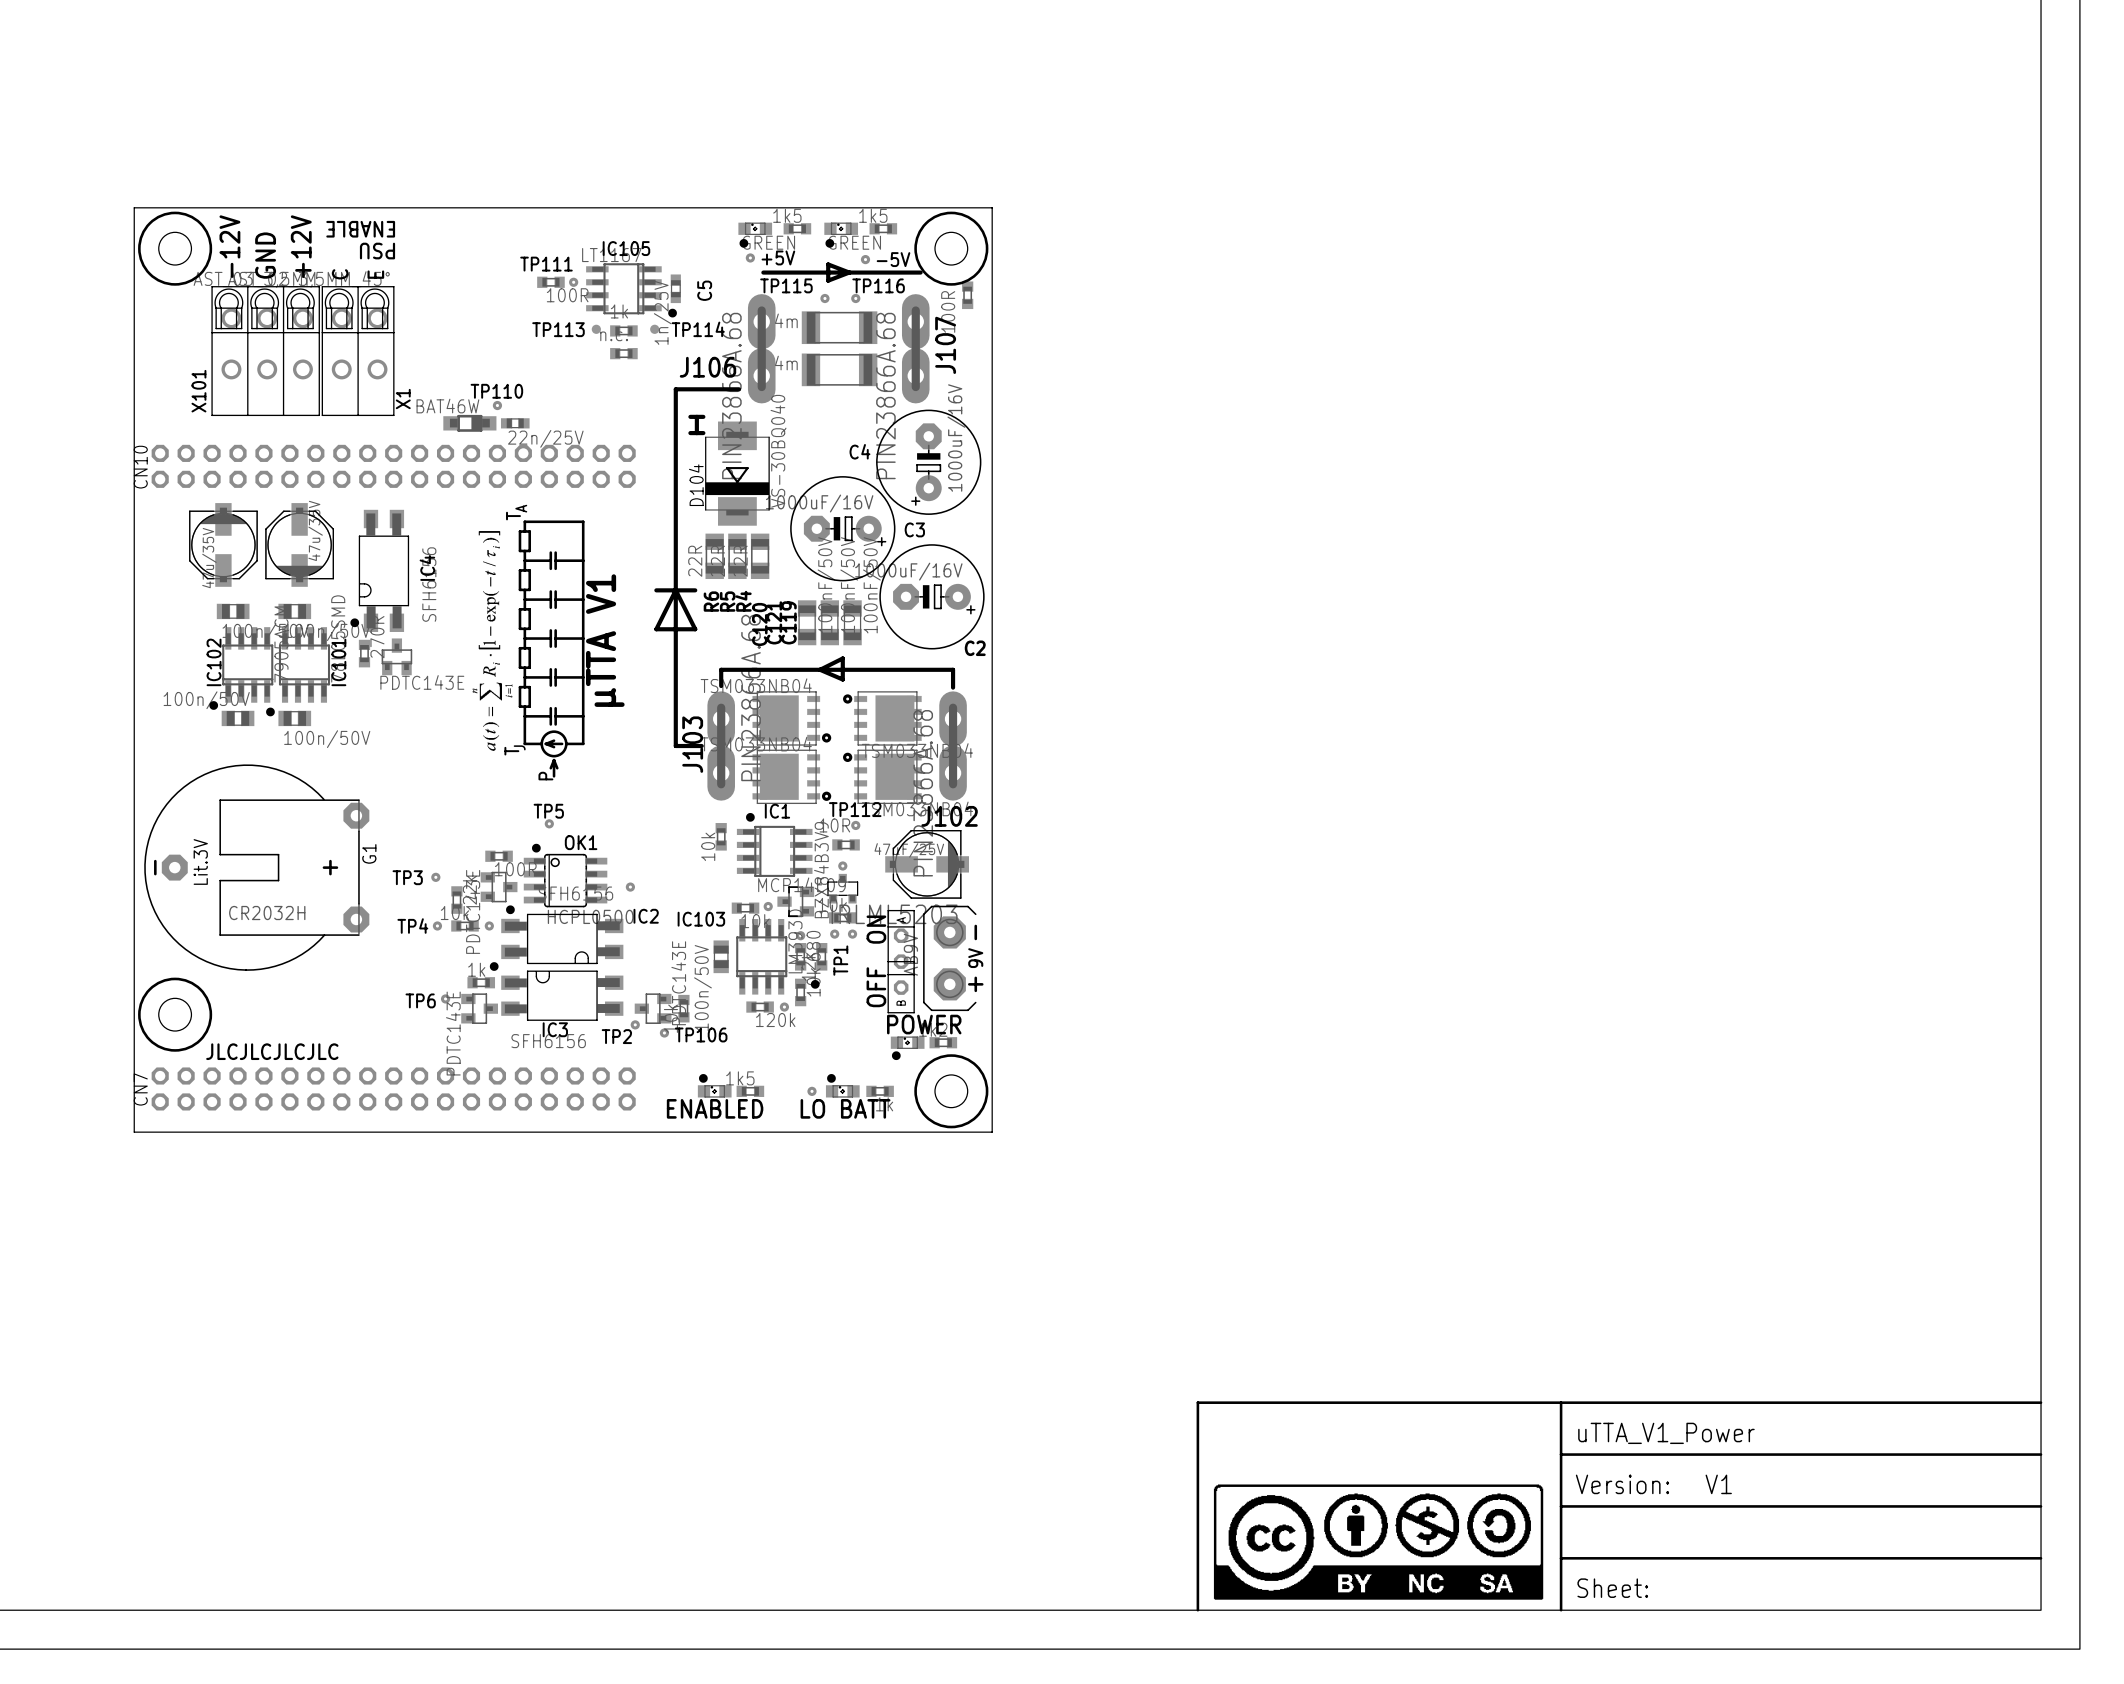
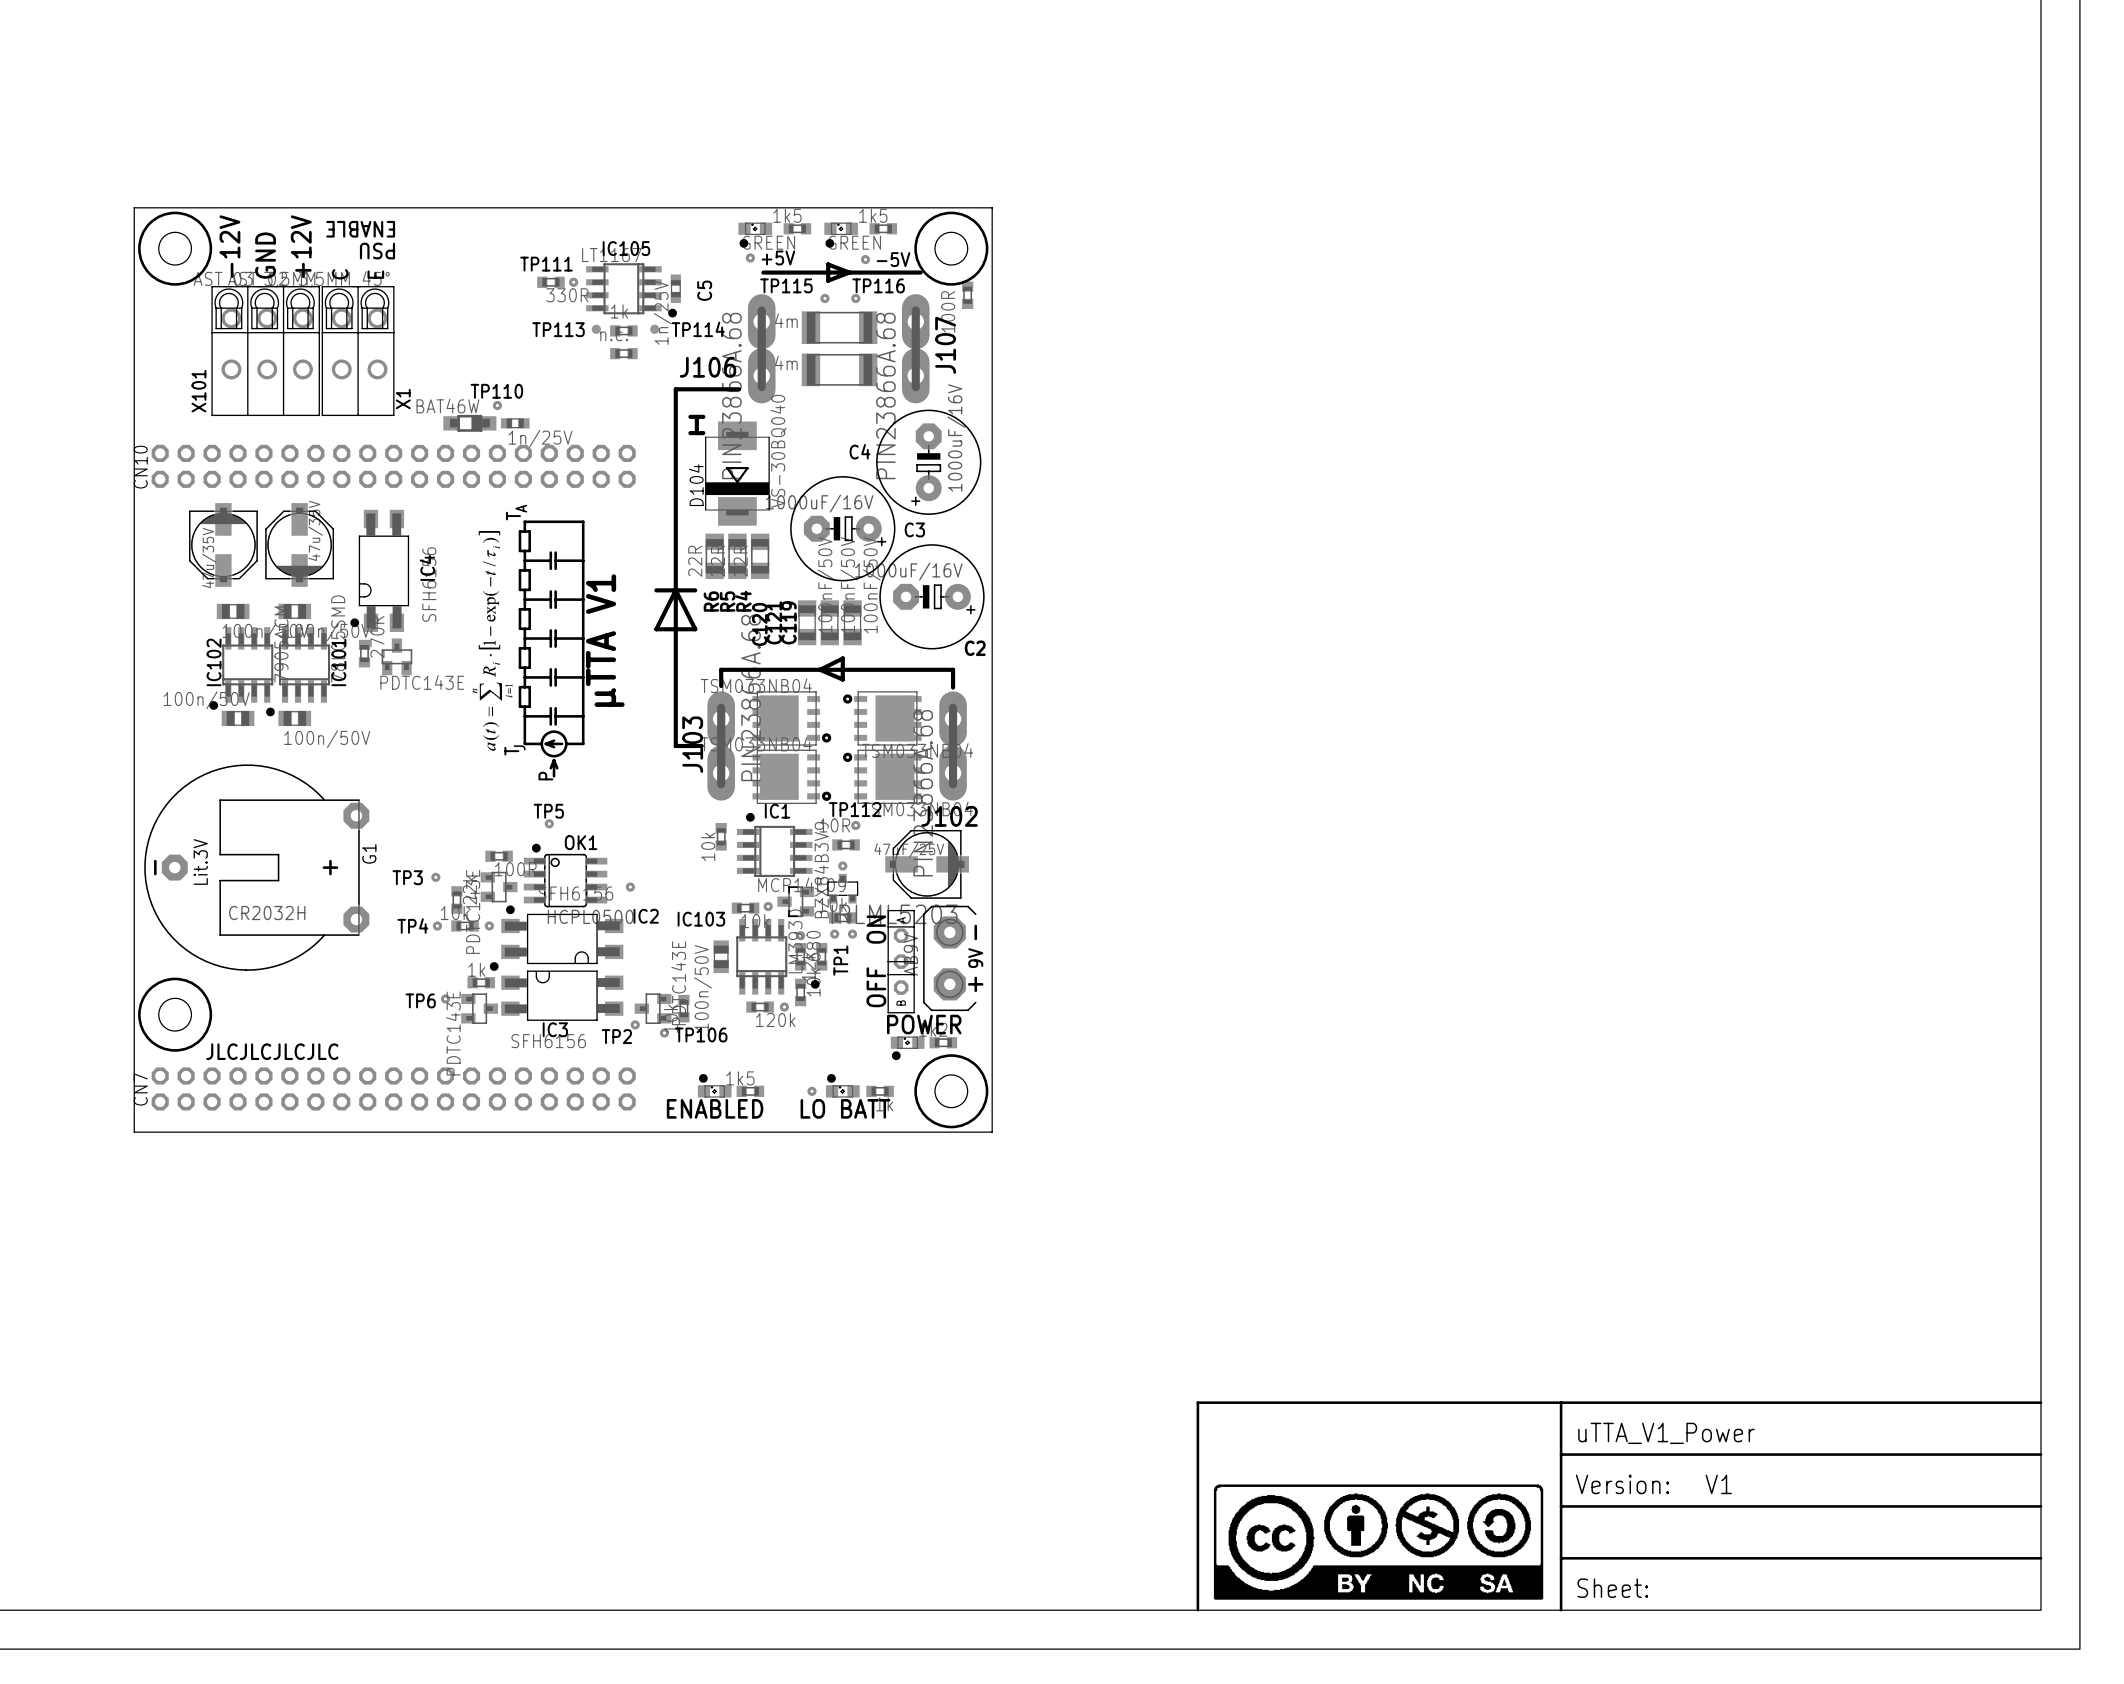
part value: 100R (567, 295) -> 330R (567, 295)
part value: 22n/25V (545, 438) -> 1n/25V (540, 438)

